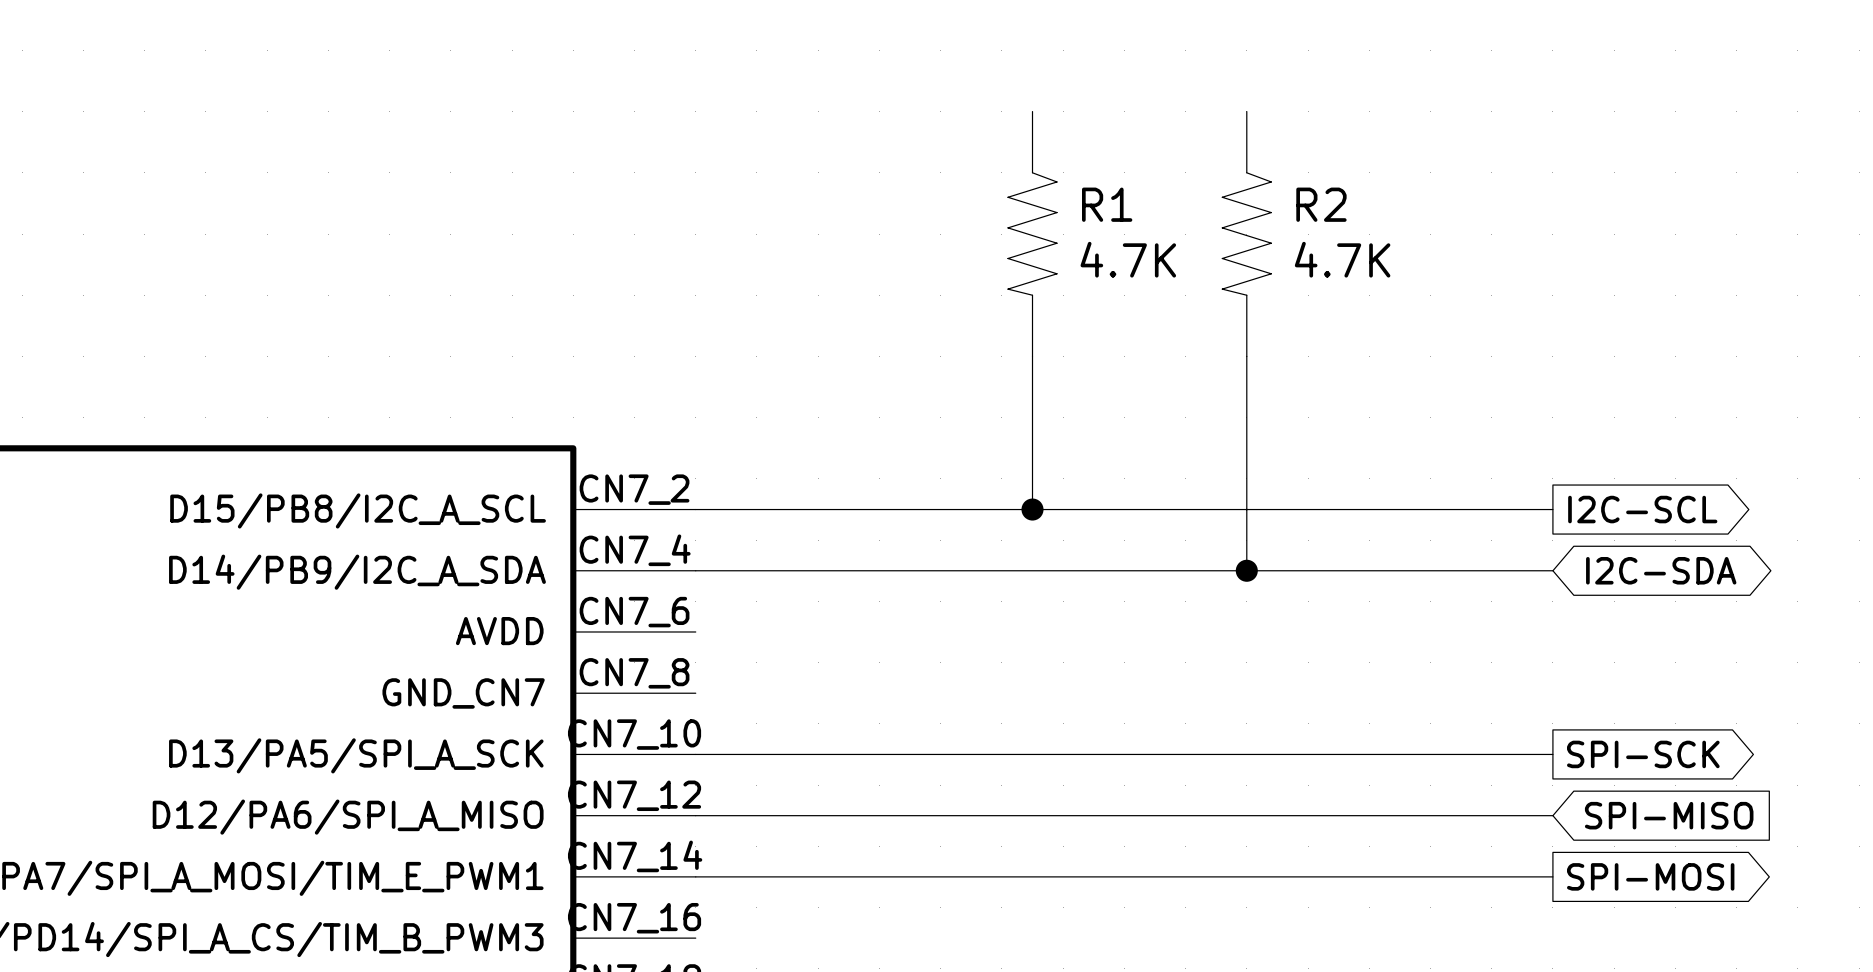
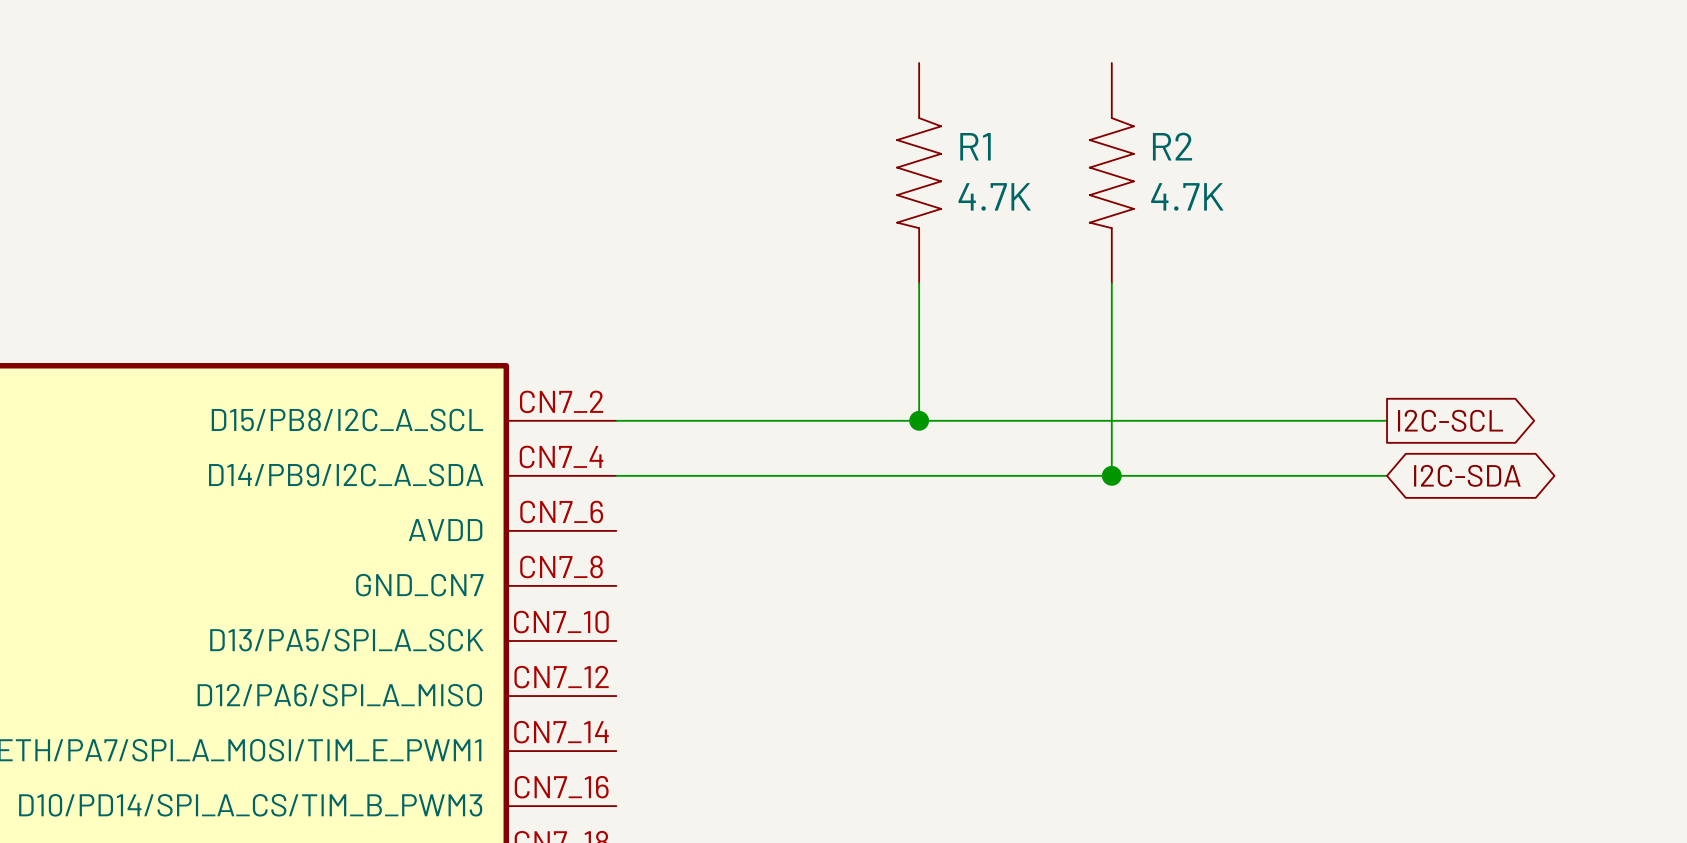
wire: (695, 754) (1552, 754) -> none
global label: SPI-SCK (1643, 754) -> none
wire: (695, 815) (1552, 815) -> none
global label: SPI-MISO (1669, 815) -> none
wire: (695, 876) (1552, 876) -> none
global label: SPI-MOSI (1650, 876) -> none

